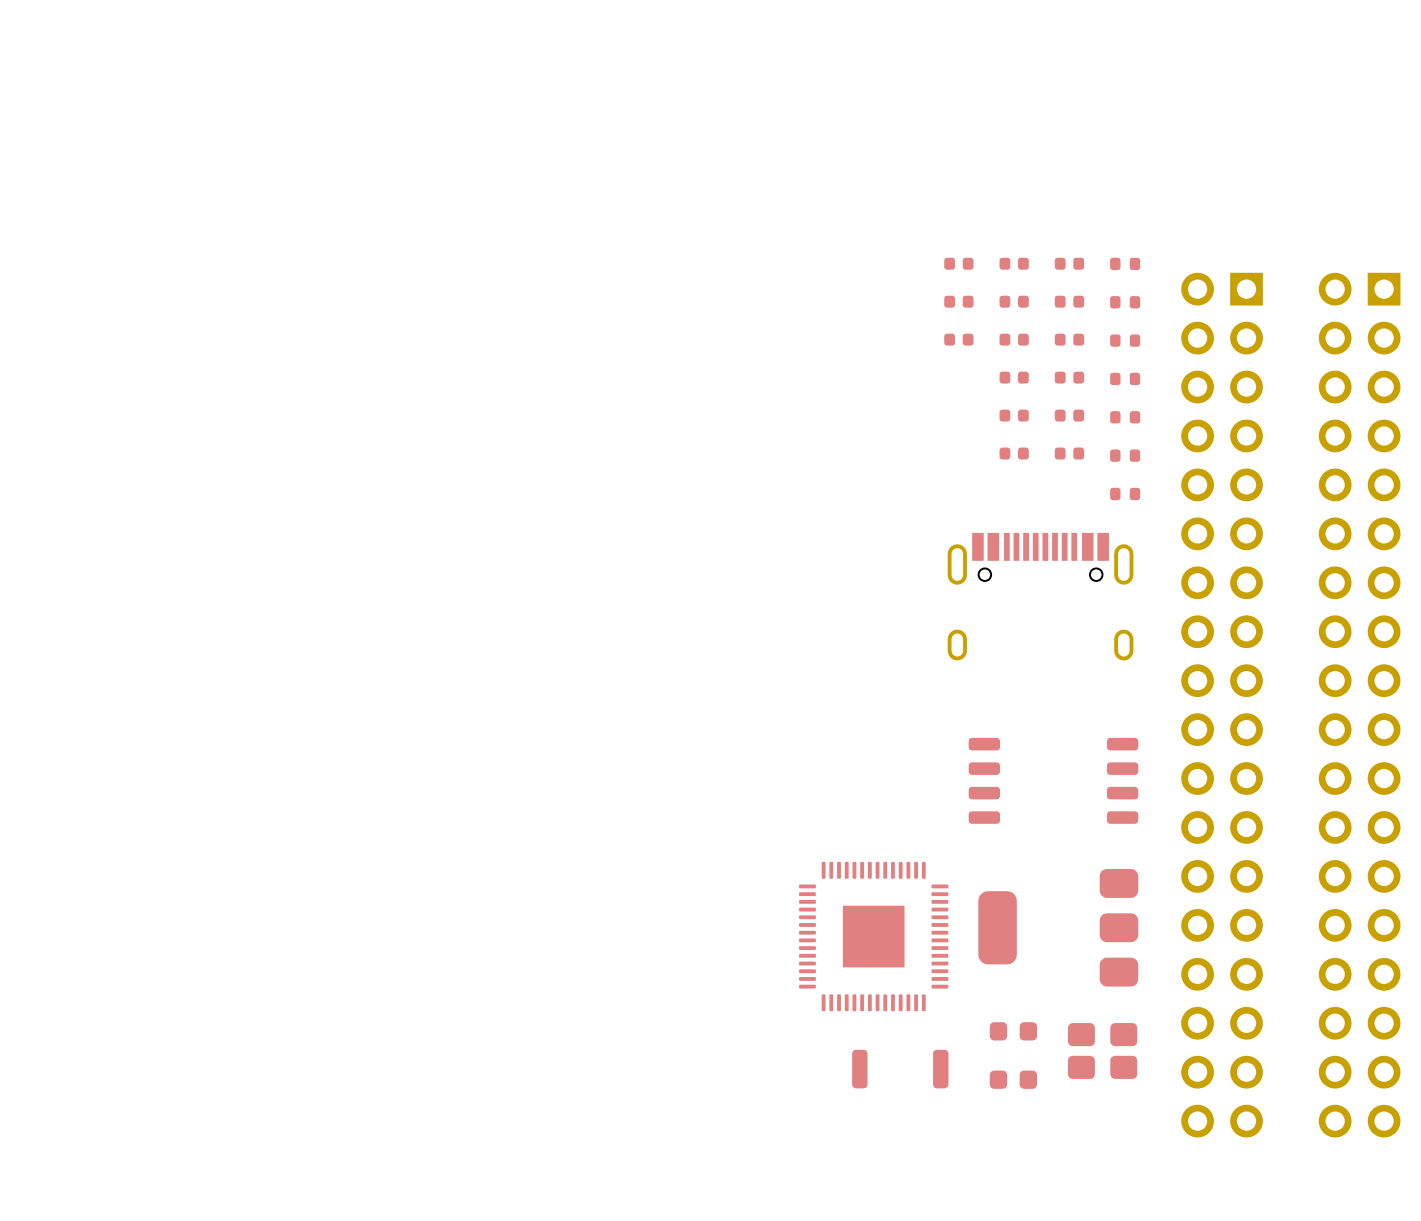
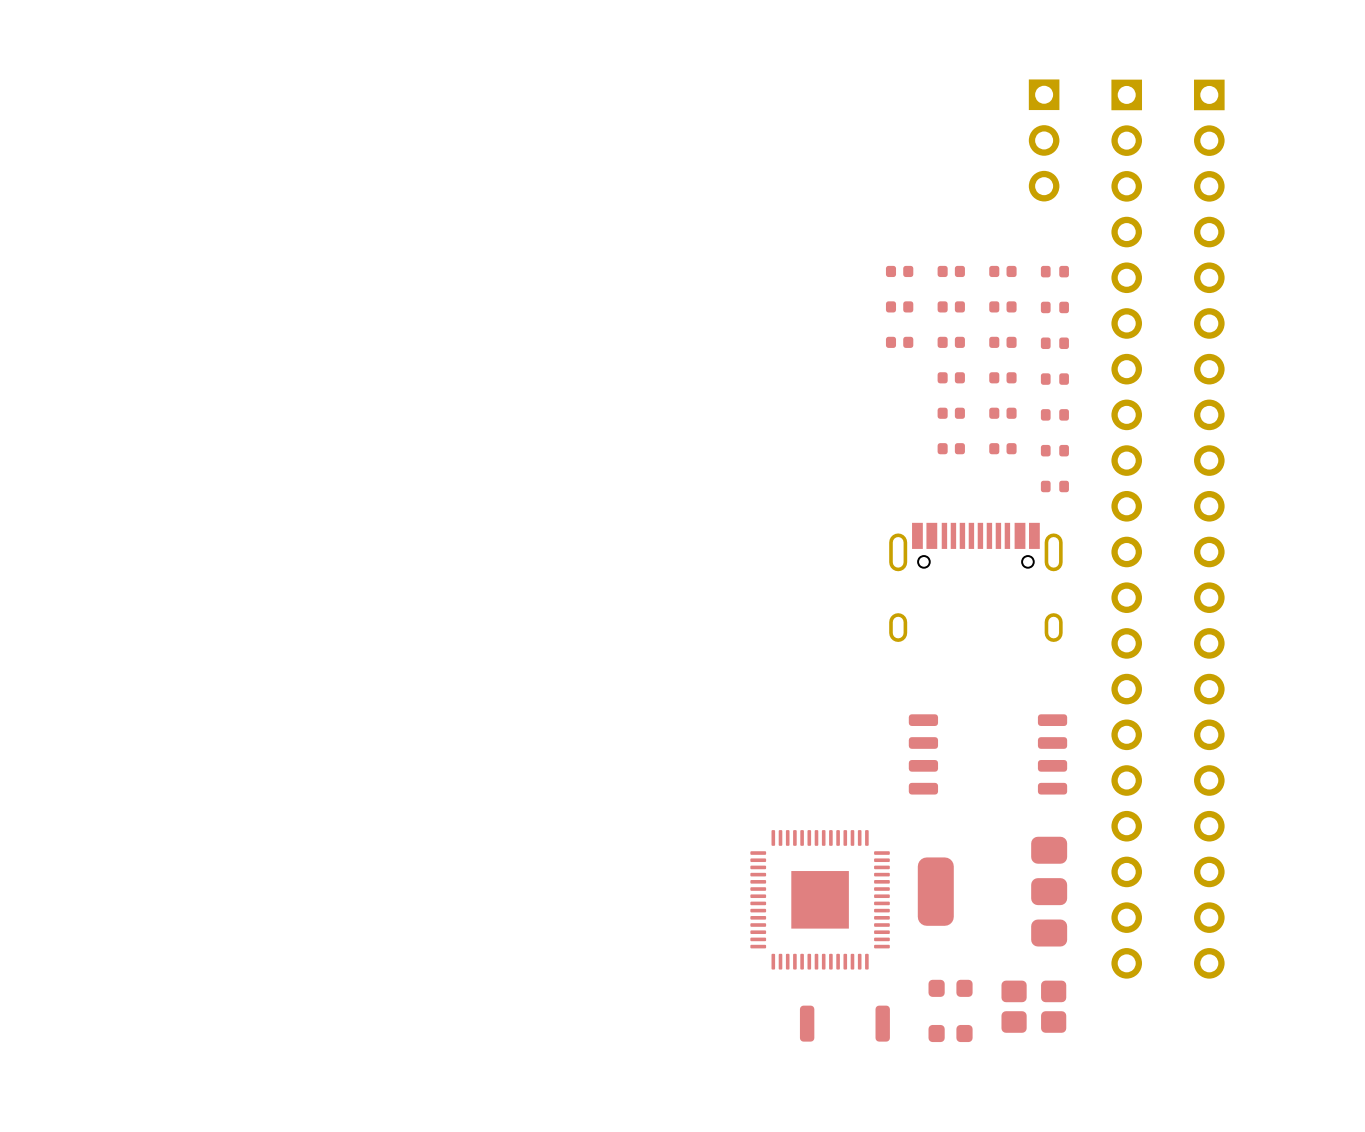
part: none -> (1044, 140)
part: none -> (1126, 529)
part: none -> (1209, 529)
part: (1222, 705) -> none
part: (1359, 705) -> none

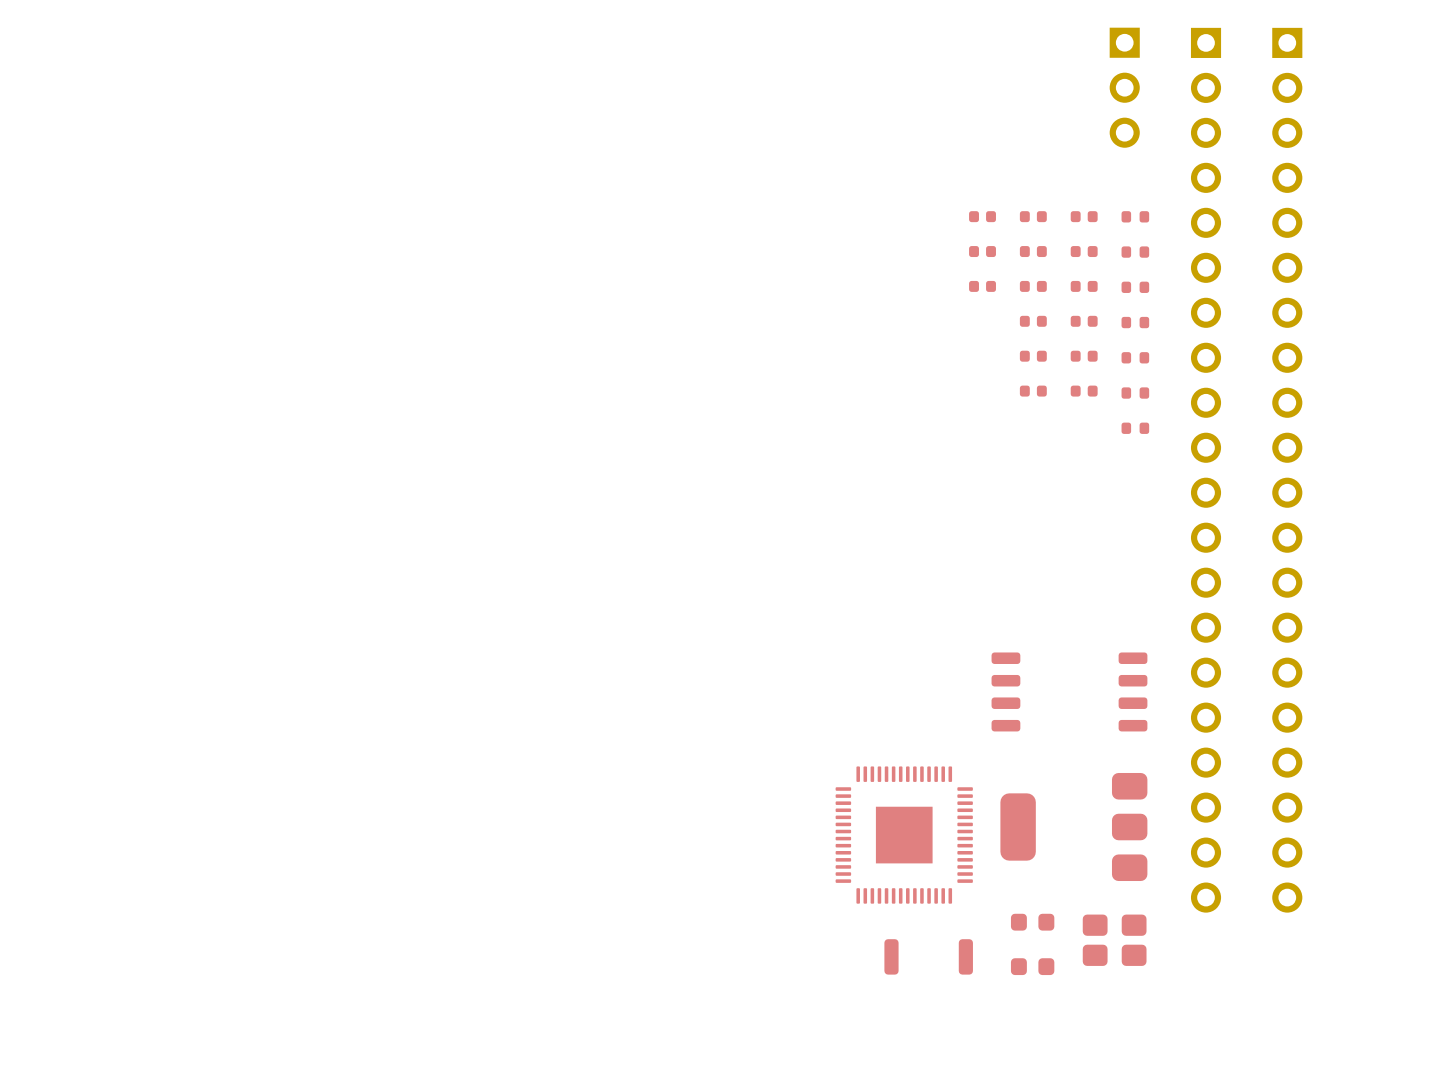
part: (975, 582) -> none

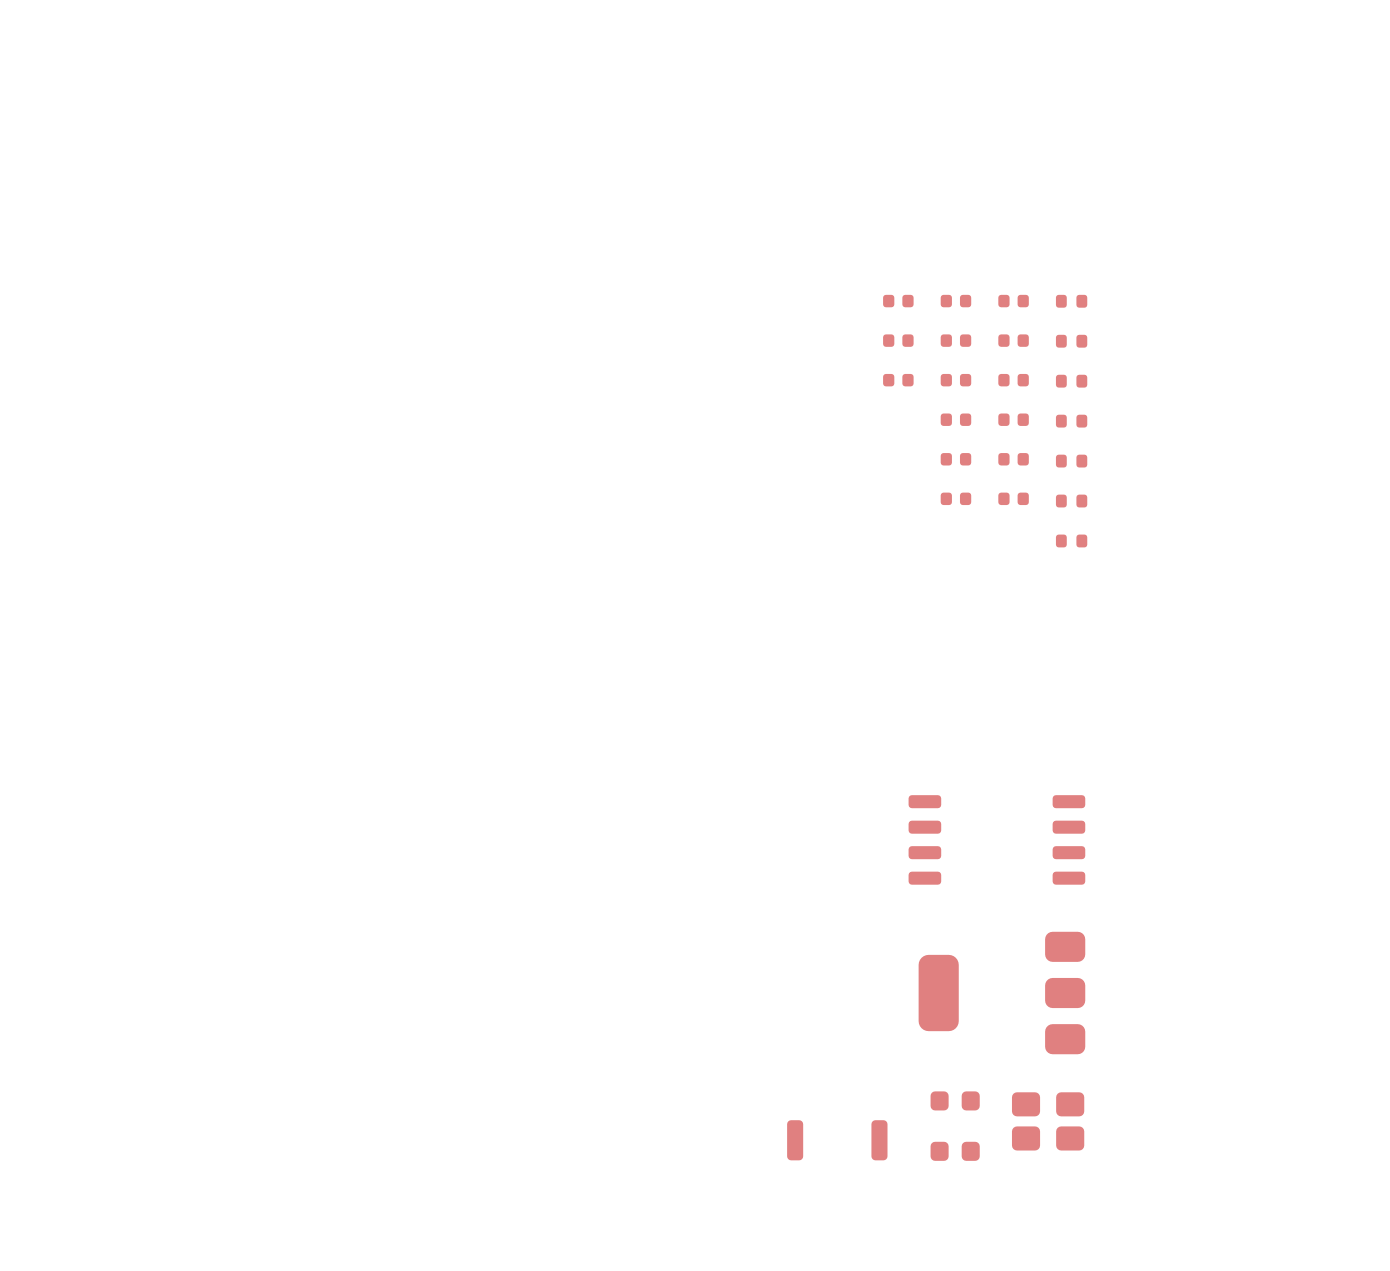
part: (1124, 87) -> none
part: (1206, 470) -> none
part: (1287, 470) -> none
part: (904, 835) -> none

